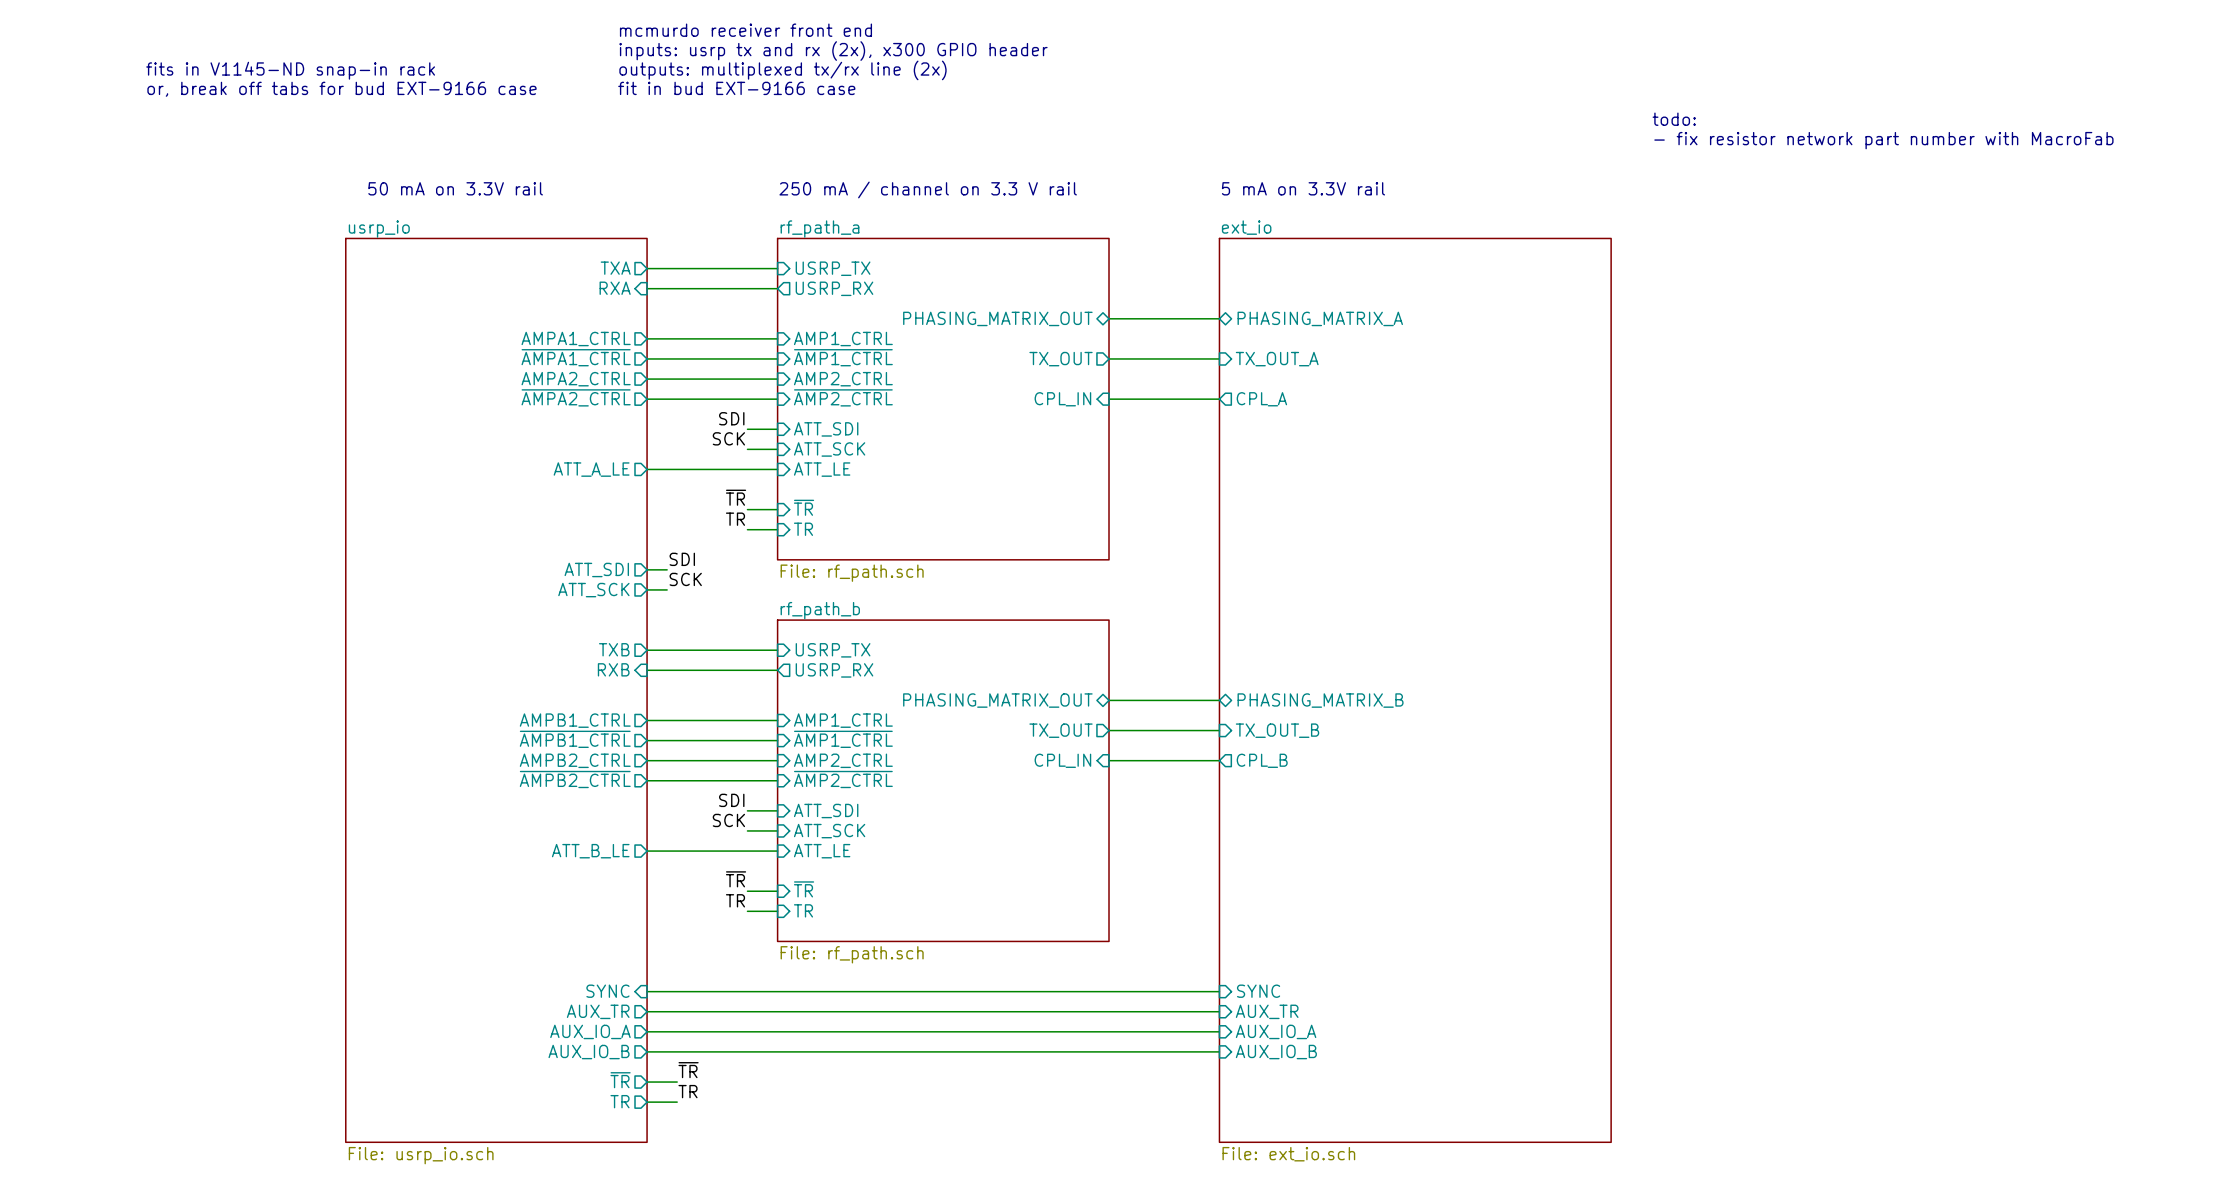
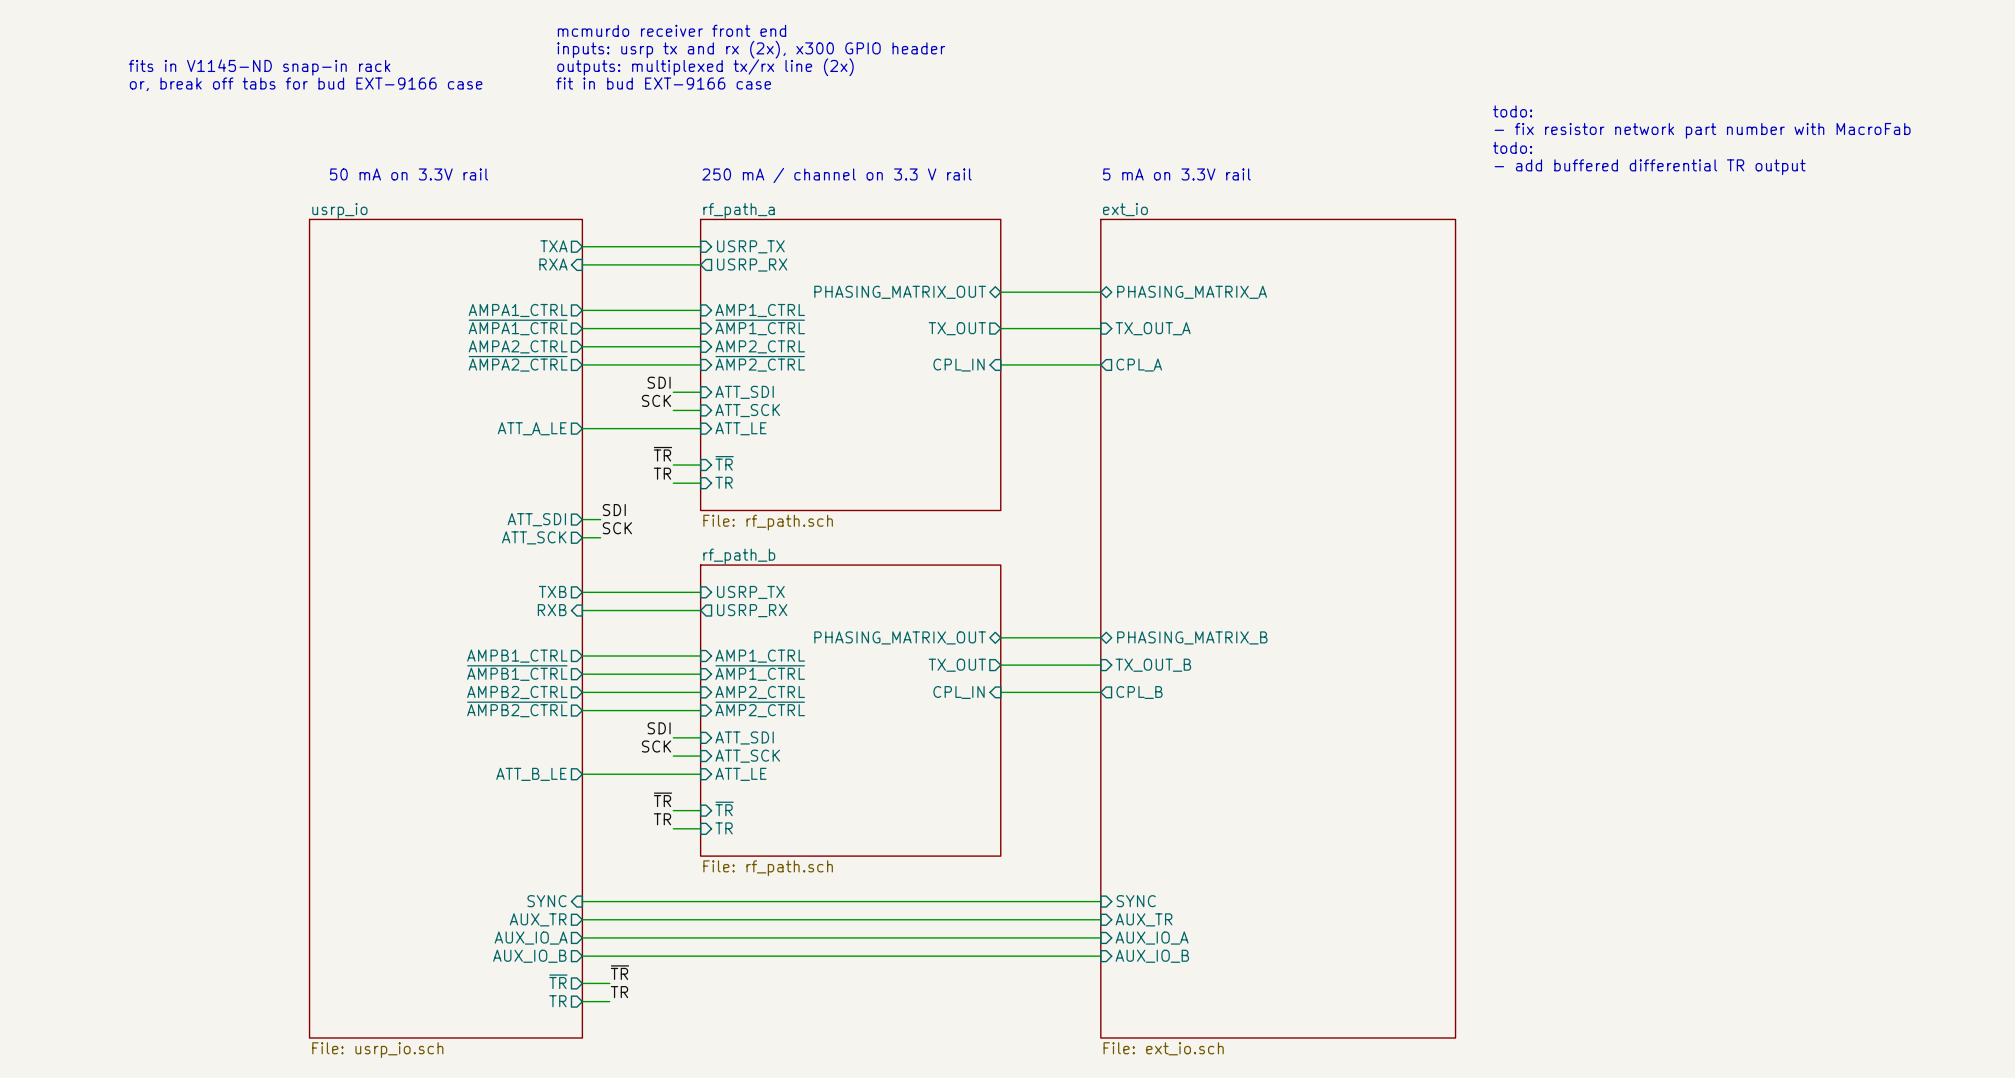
text: none -> todo: (1512, 147)
text: none -> - add buffered differential TR output (1650, 167)

